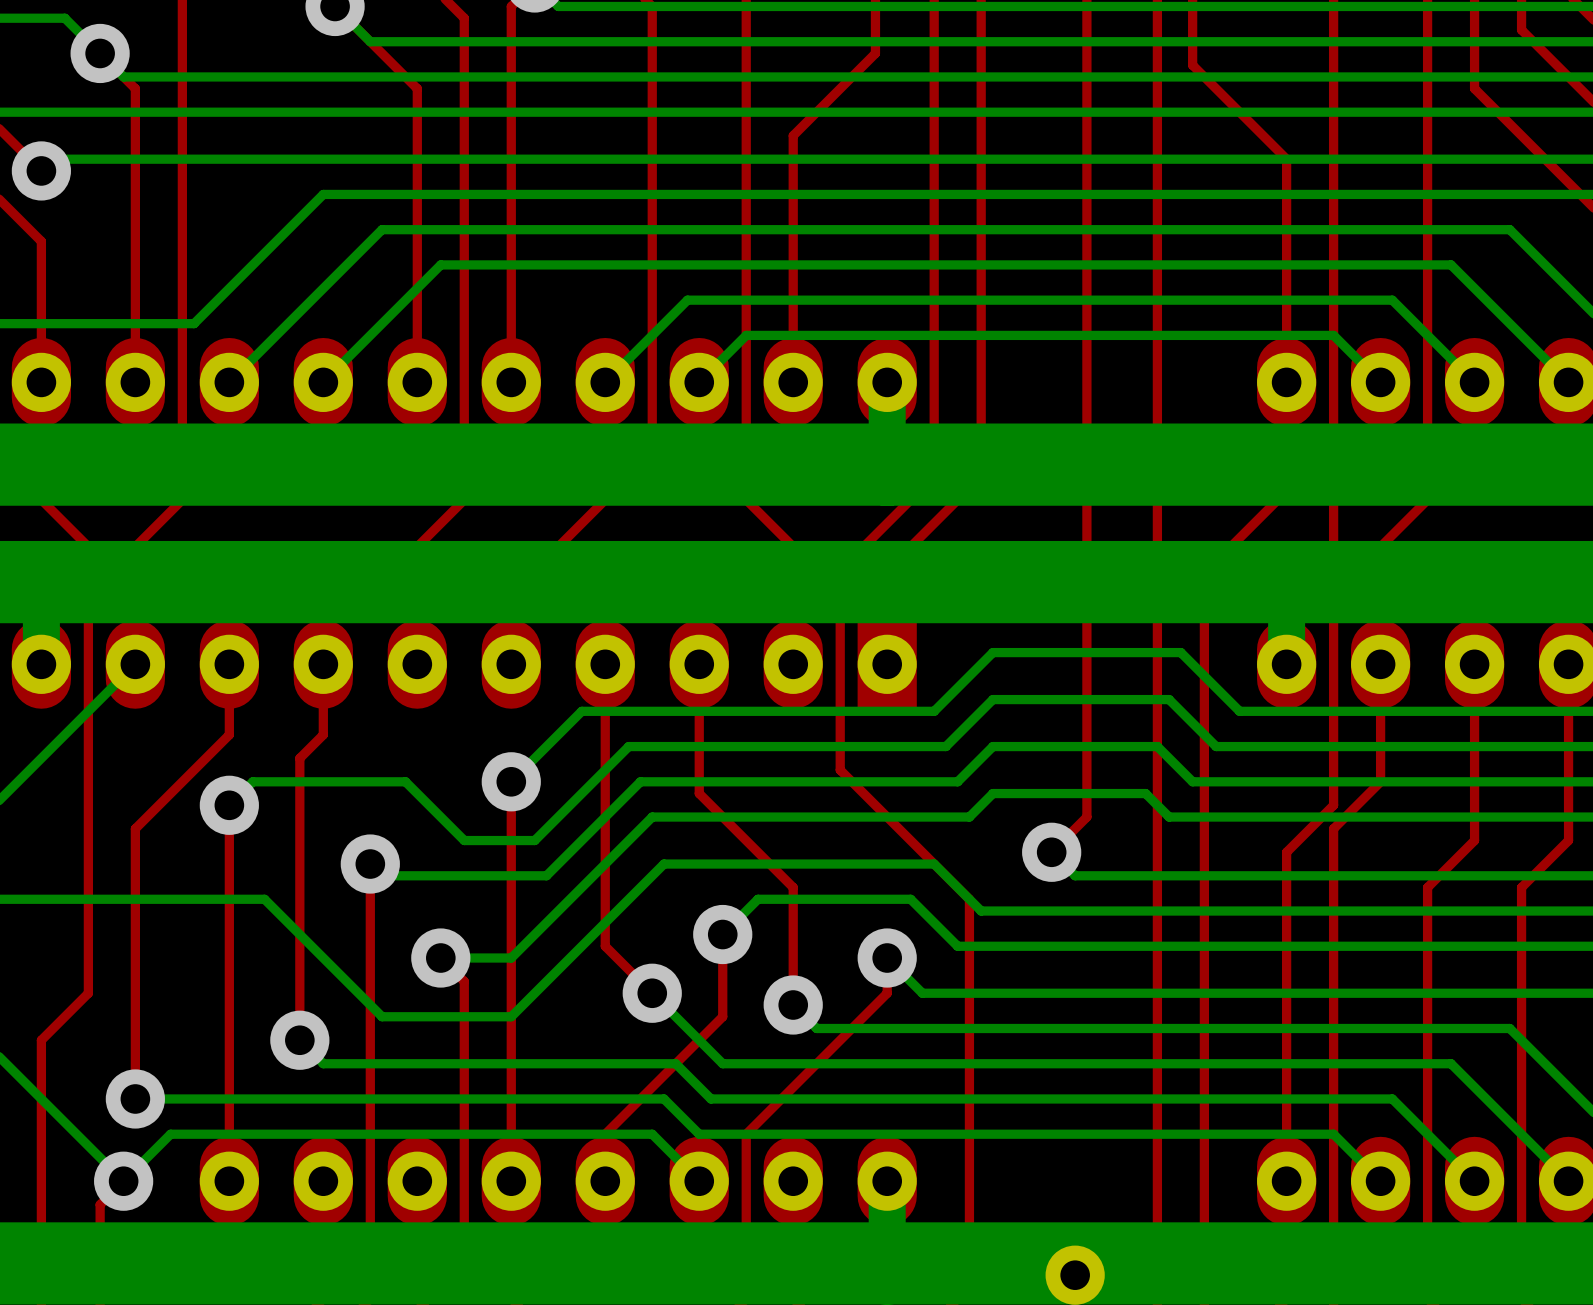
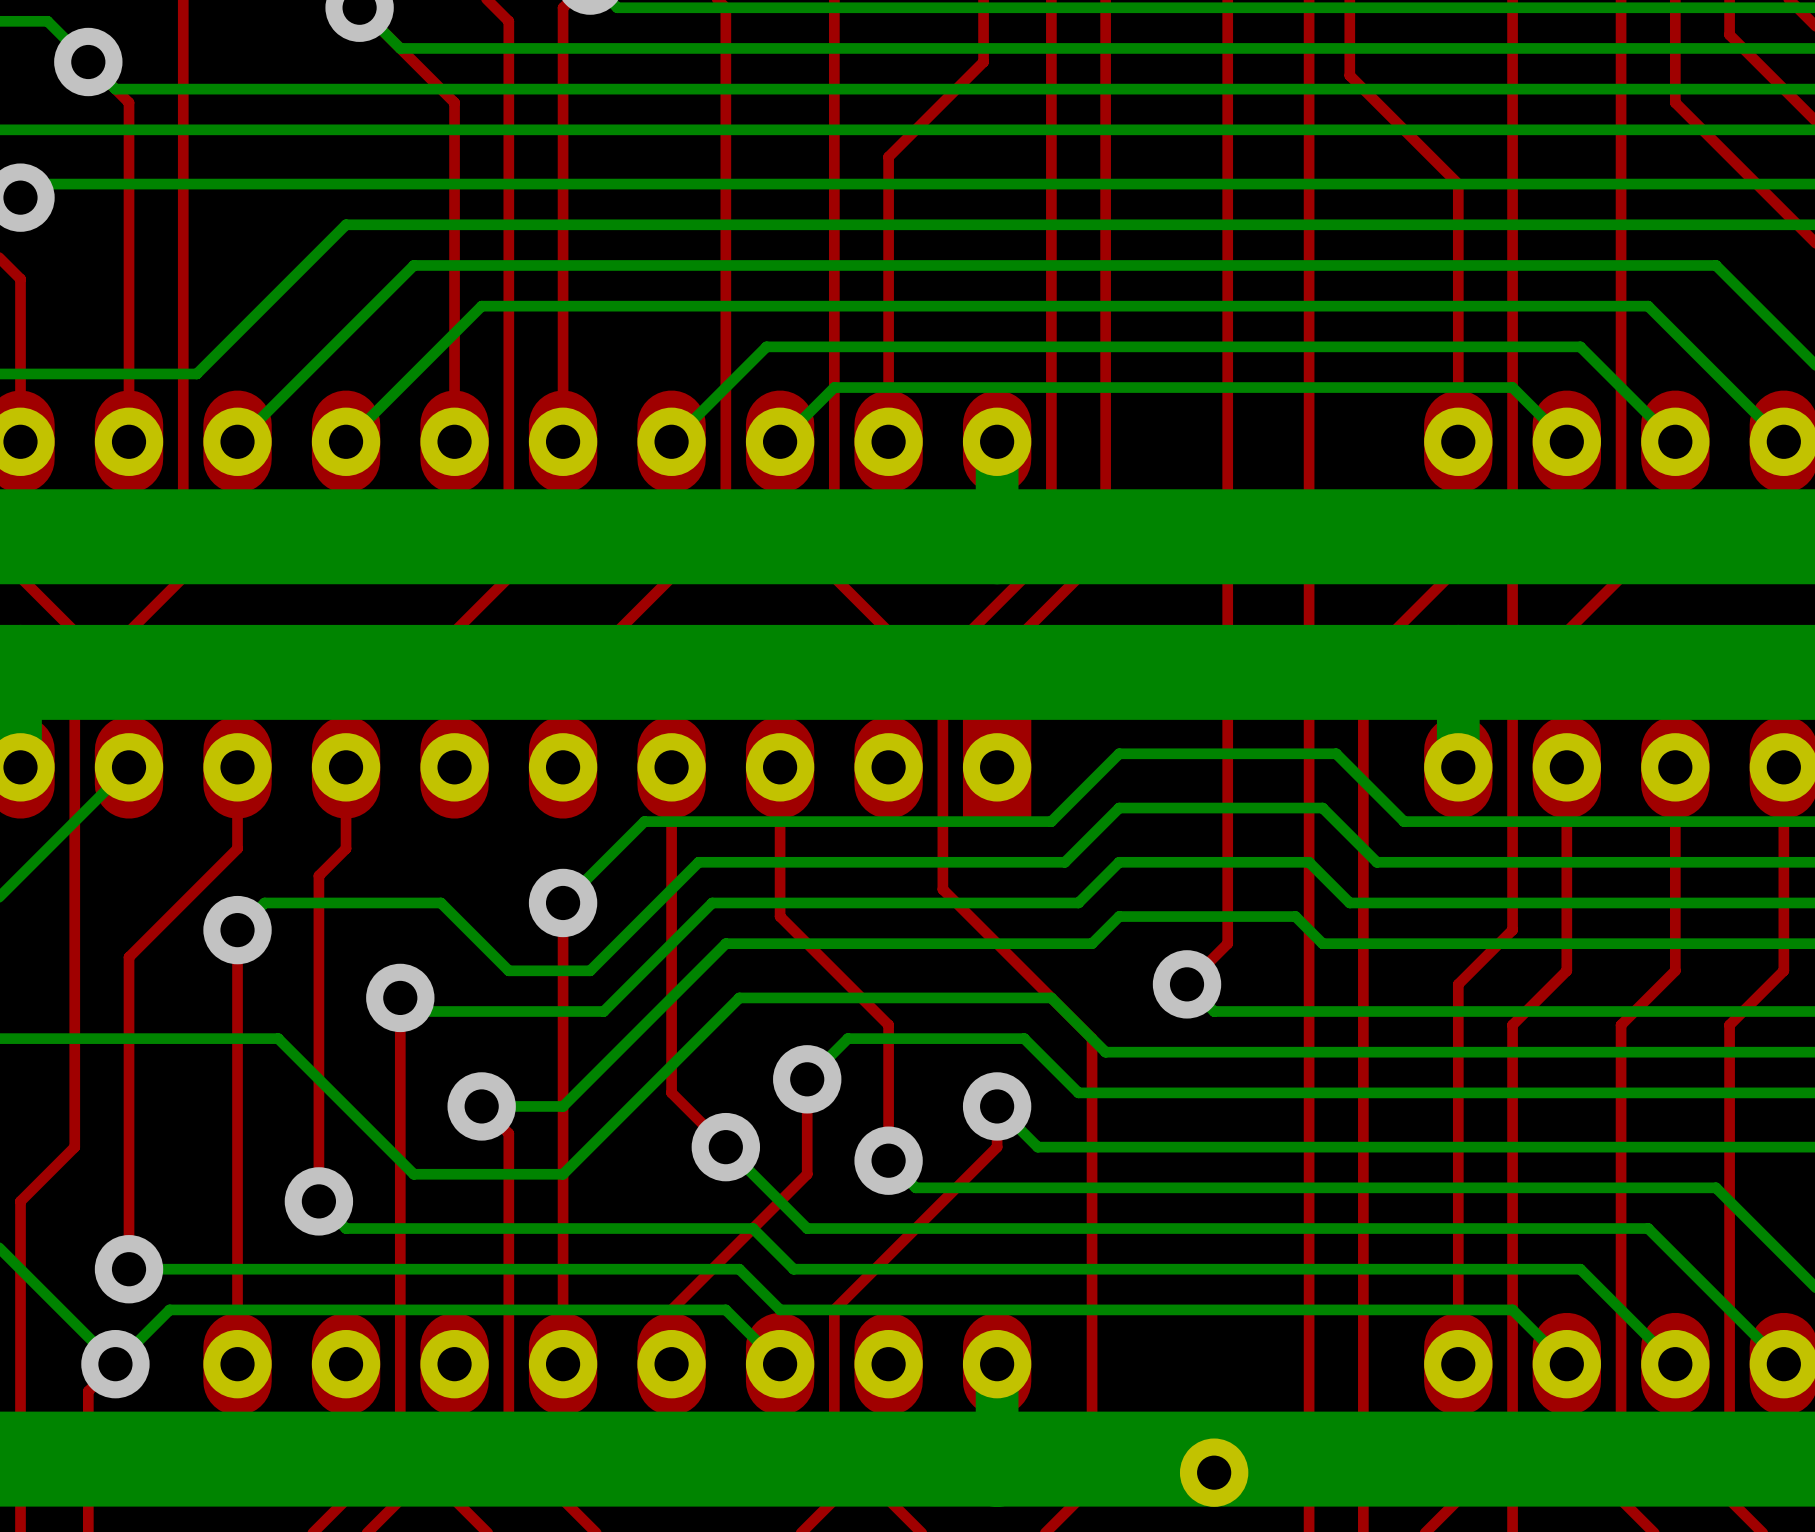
top track: (1380, 781) (1333, 828) (1333, 887) -> (1566, 903) (1566, 970) (1512, 1025)

